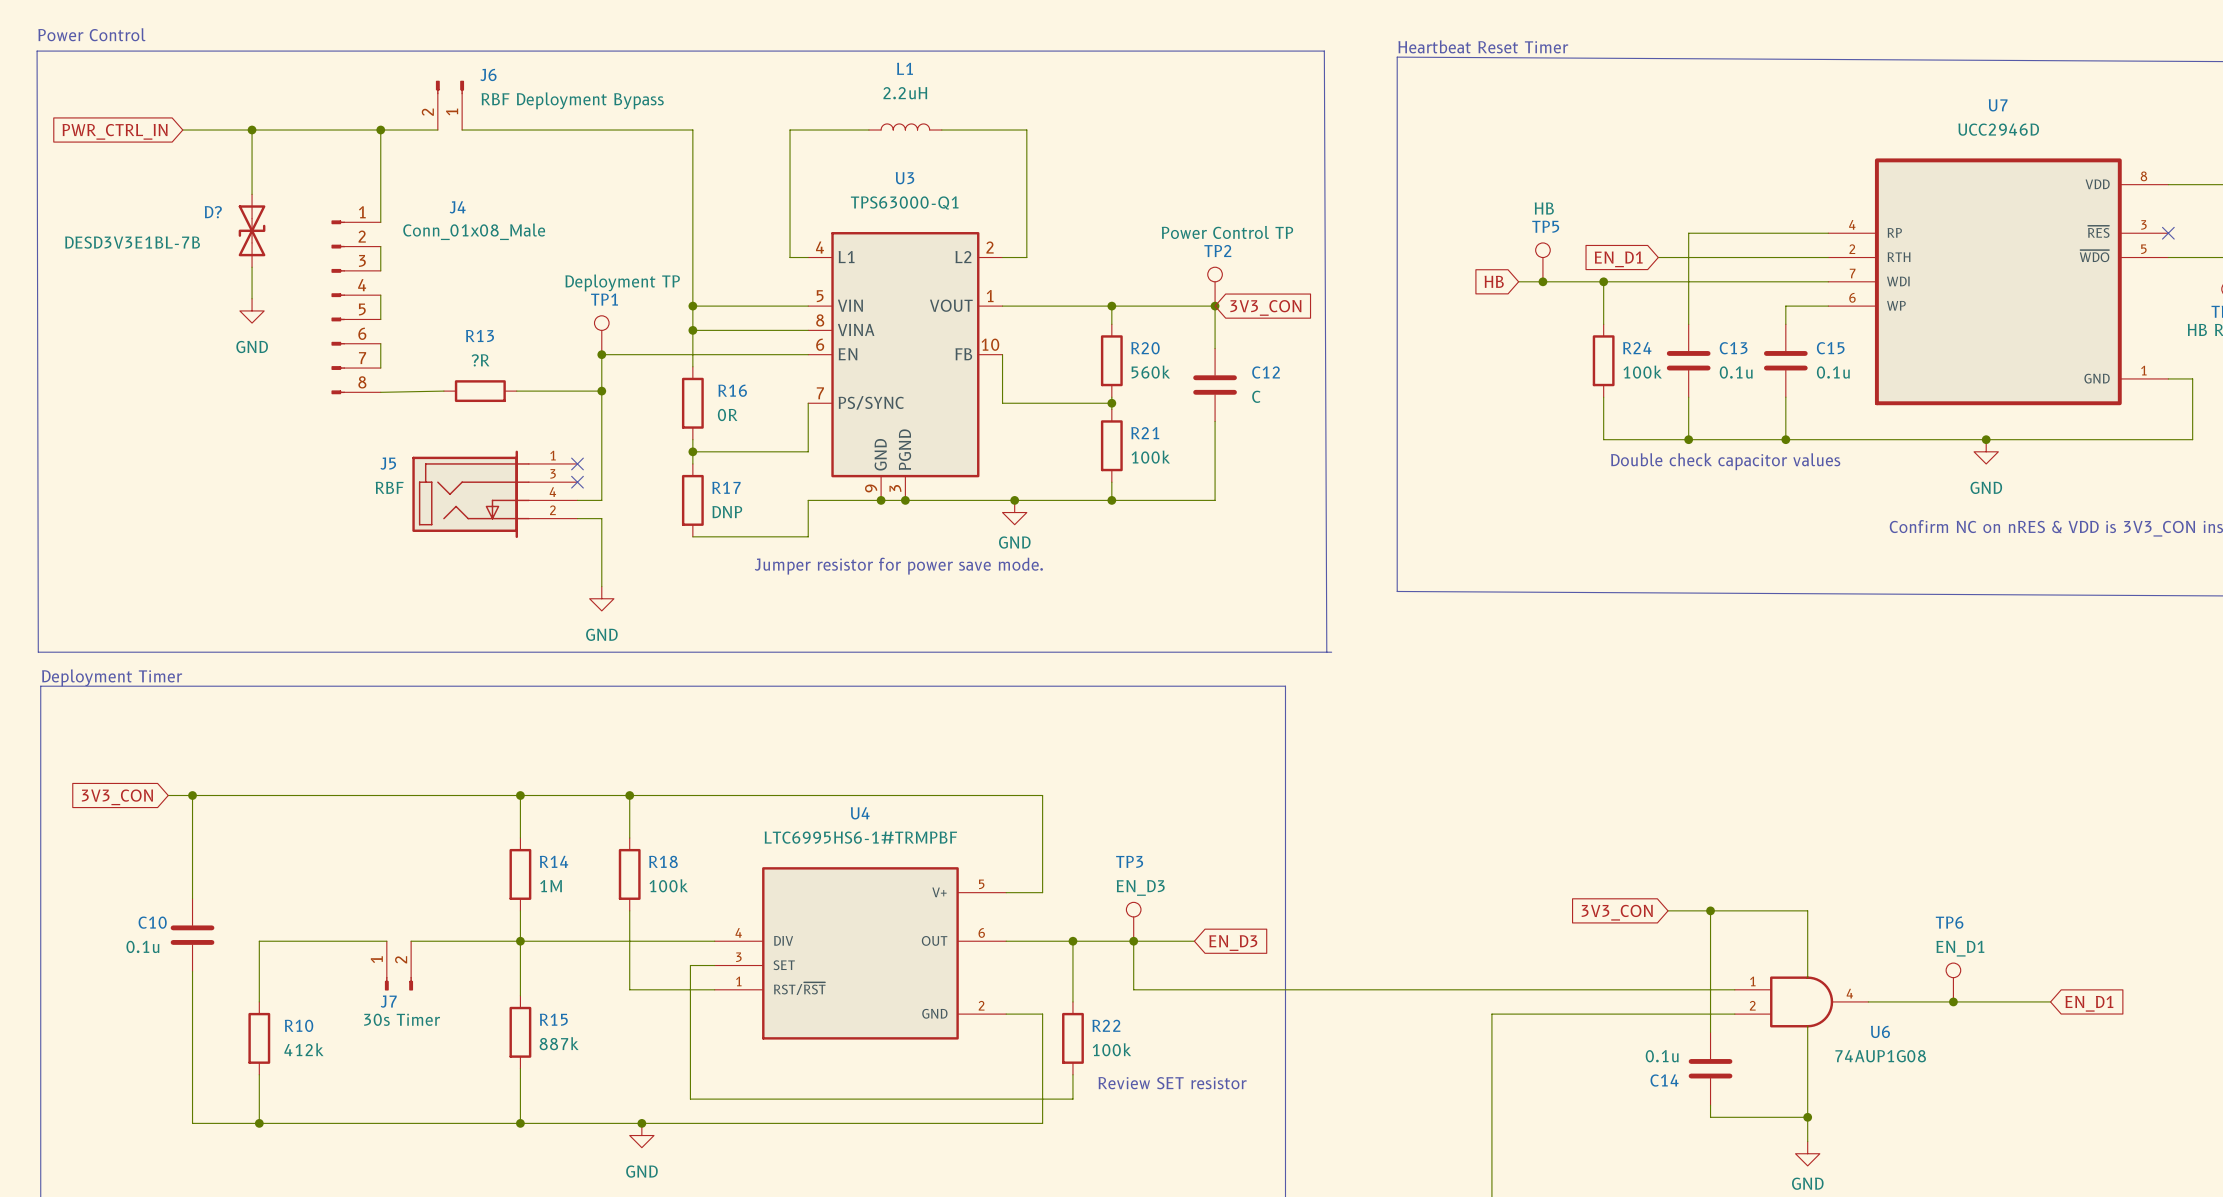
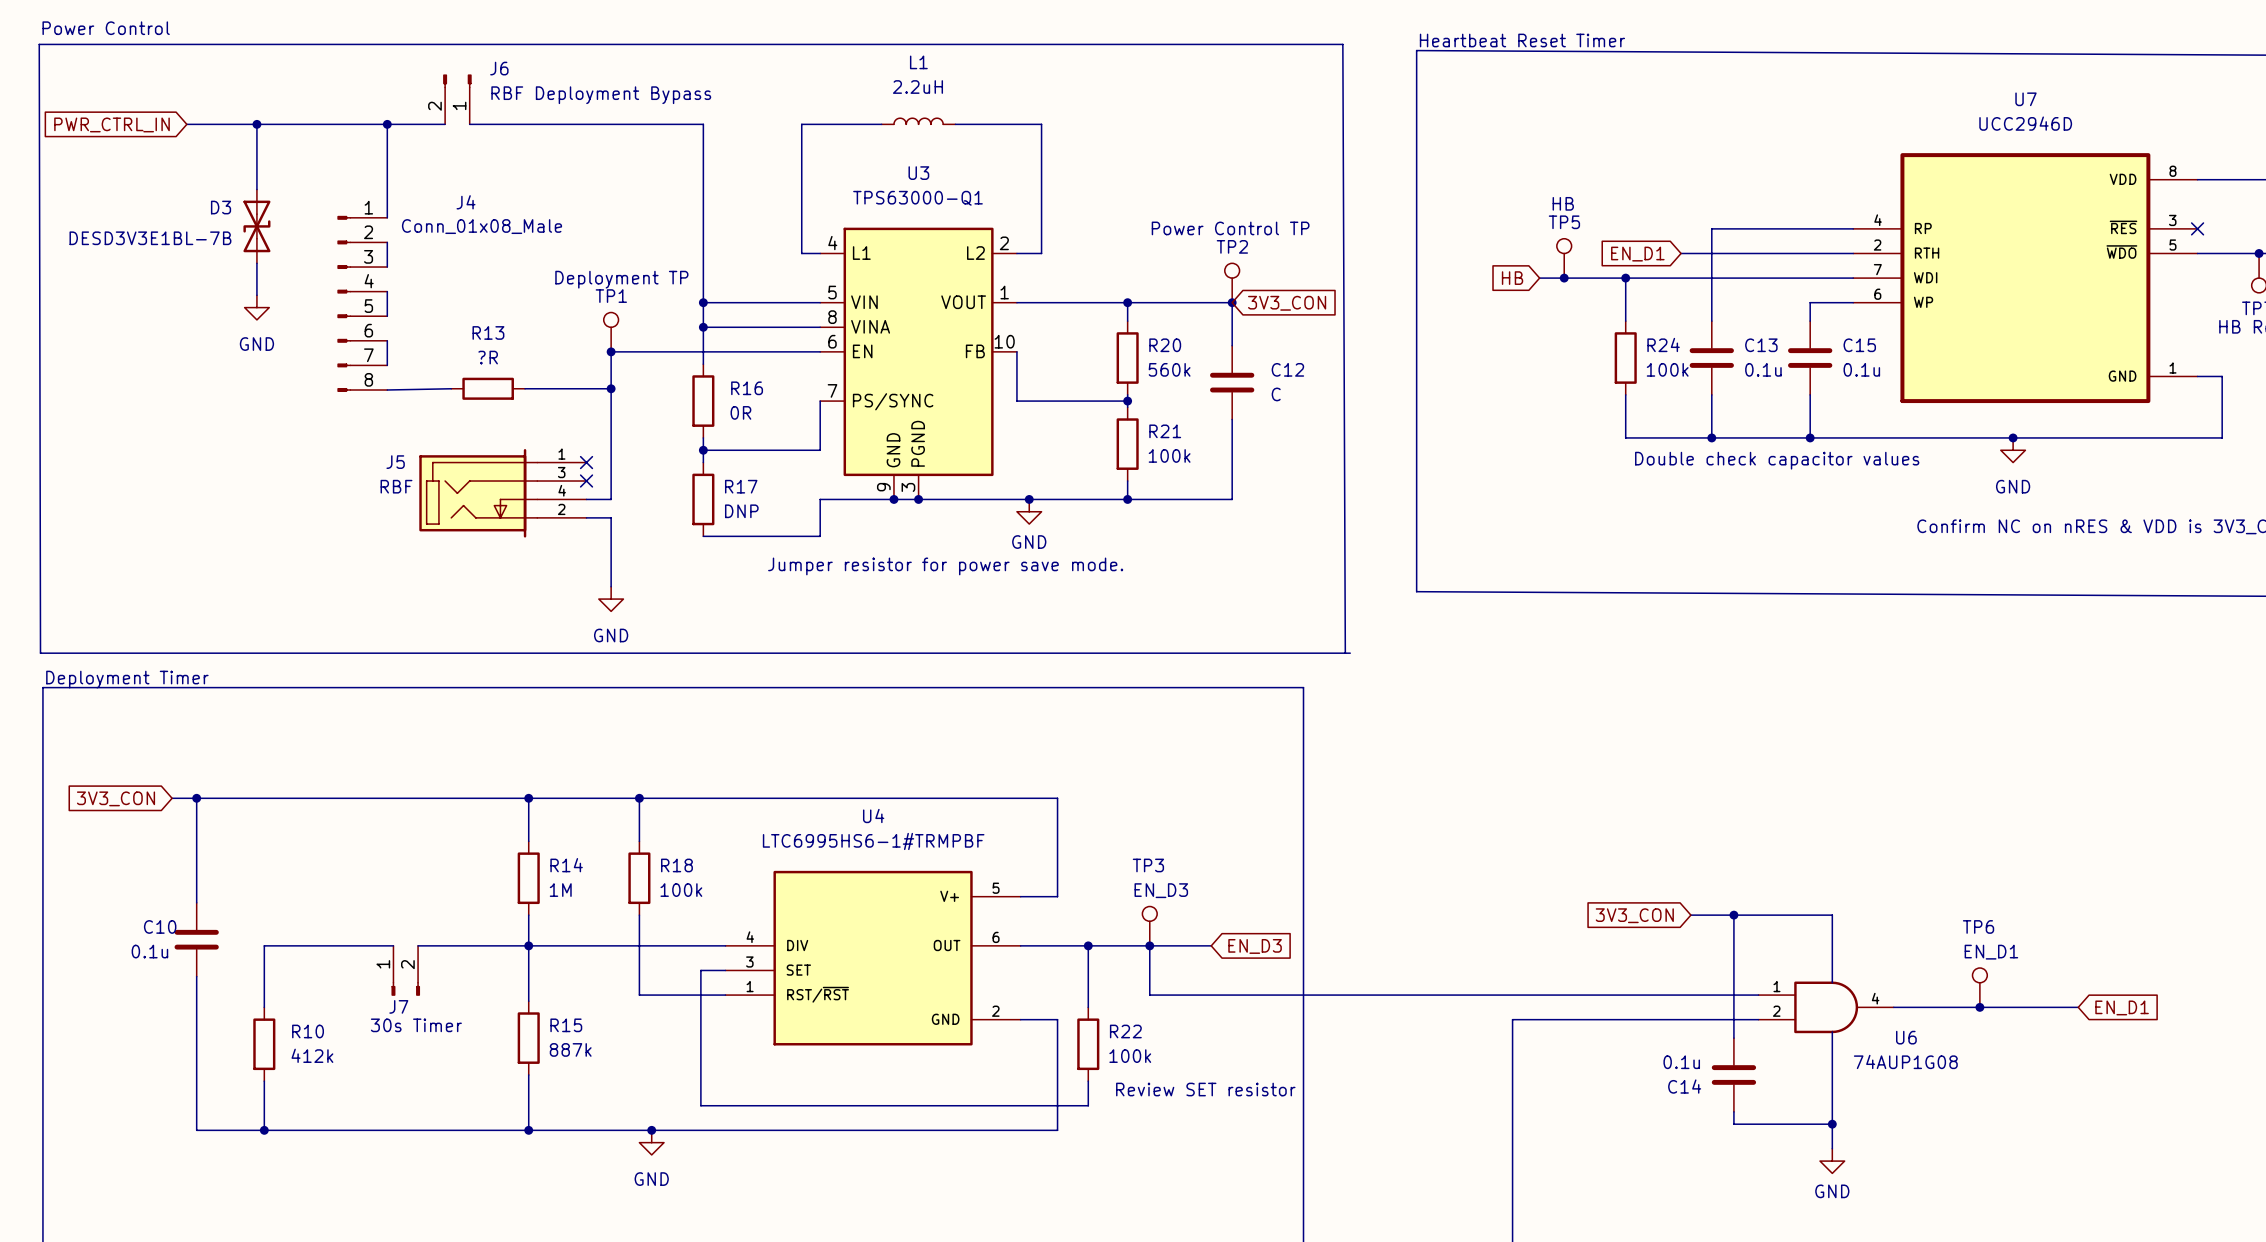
D? name: D? (213, 212) -> D3 (221, 207)

